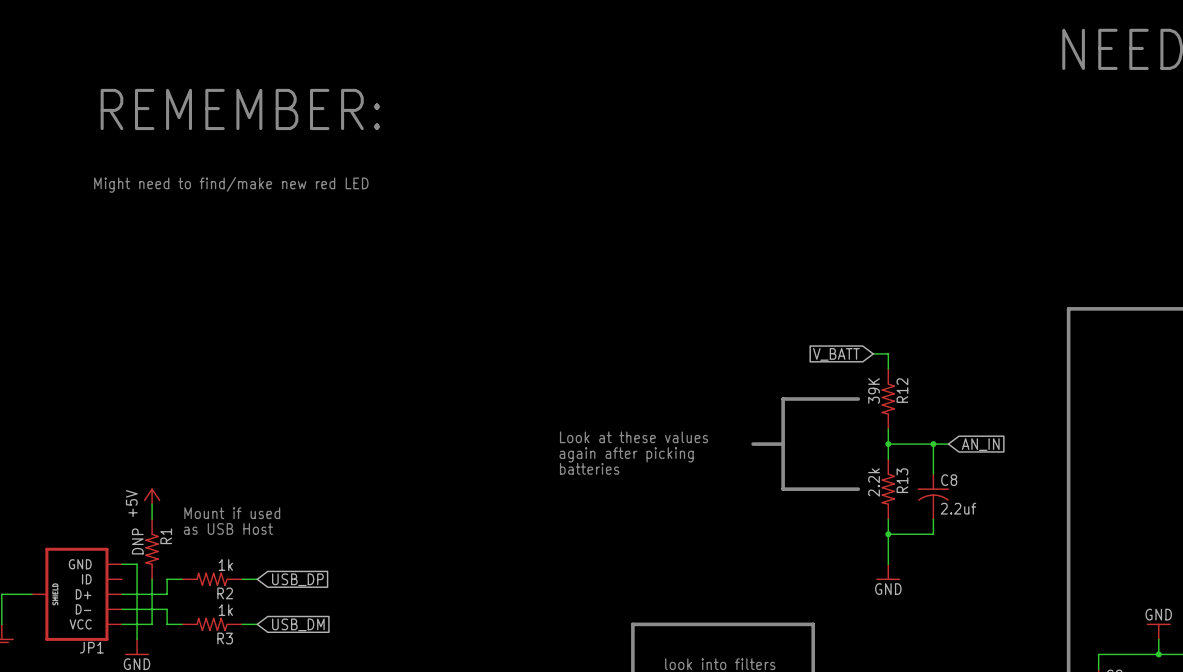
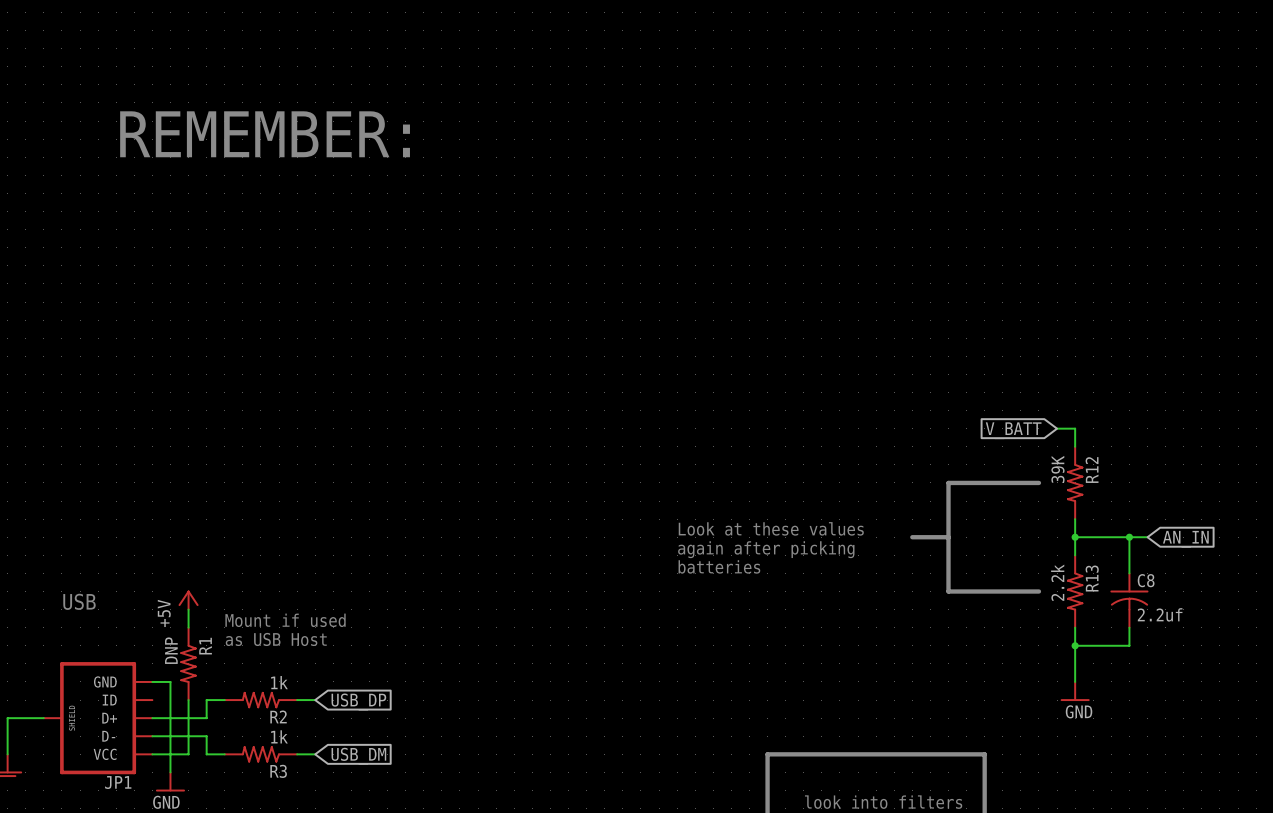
text: Might need to find/make new red LED (231, 184) -> none
text: none -> USB (79, 601)

